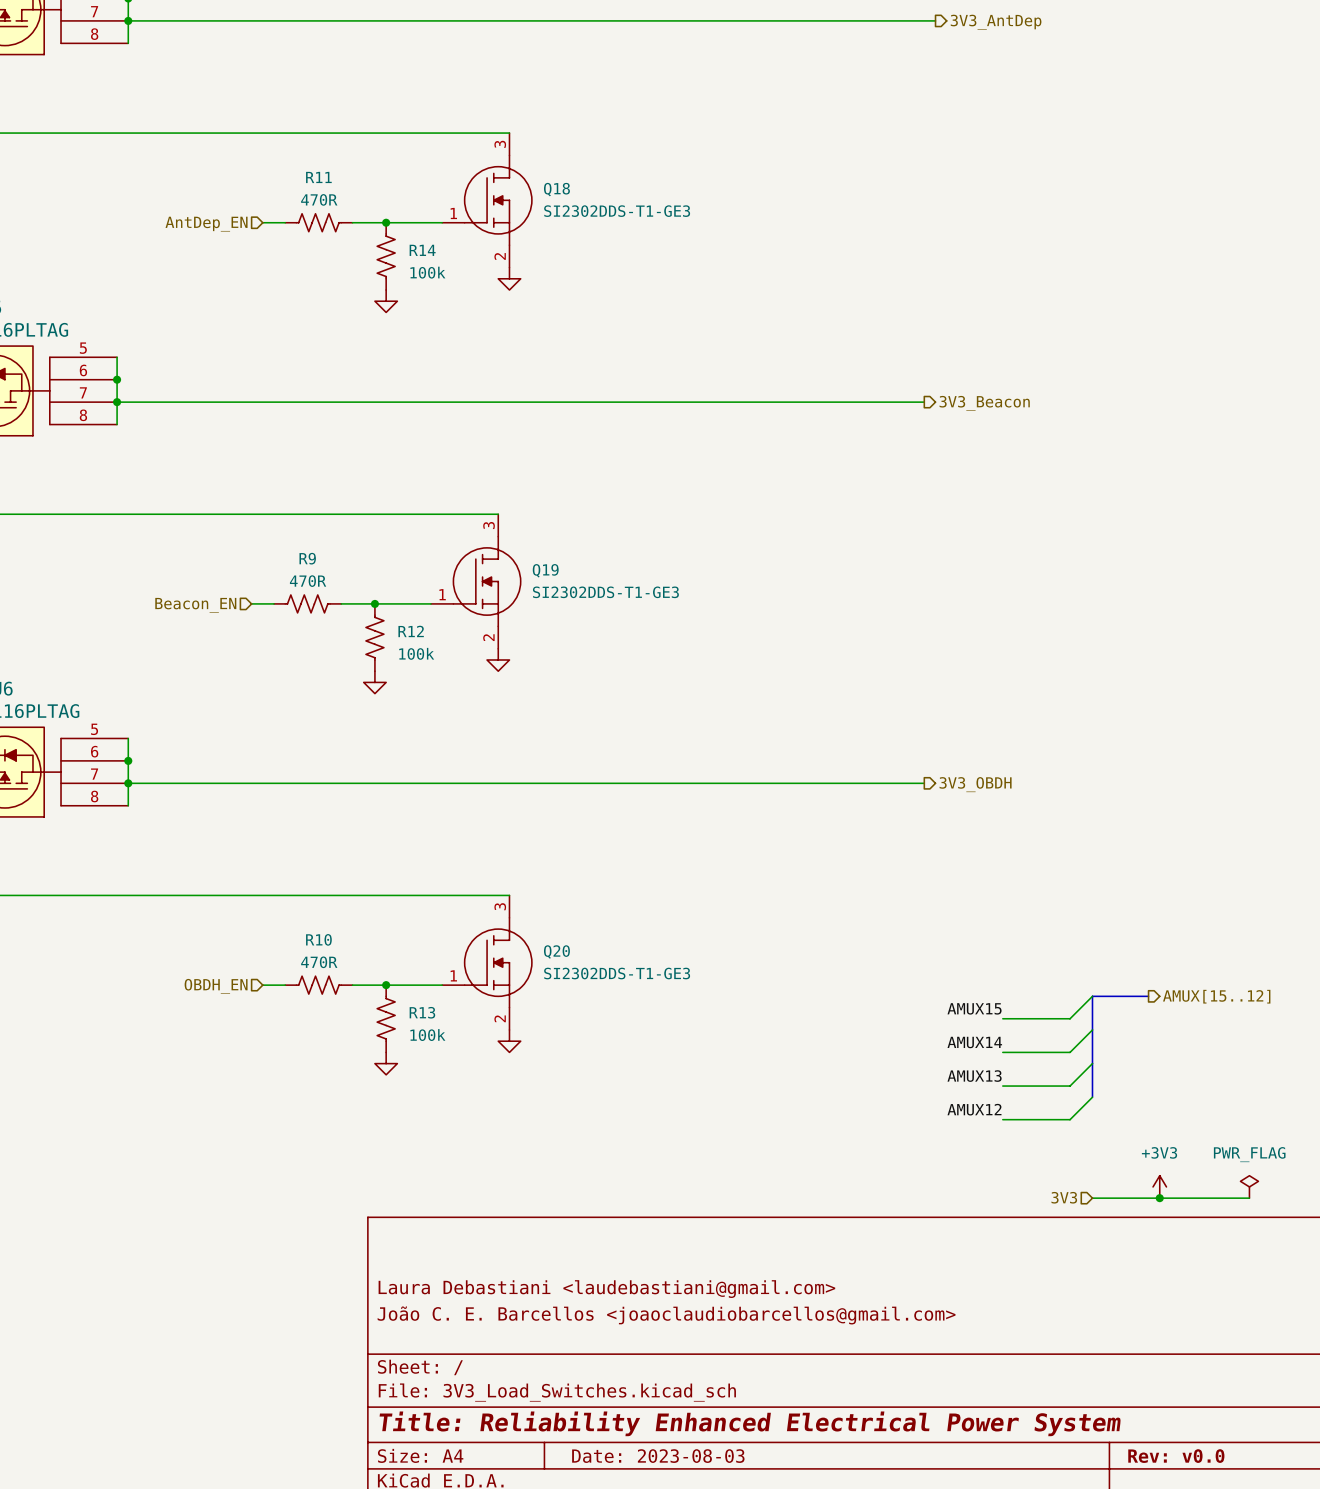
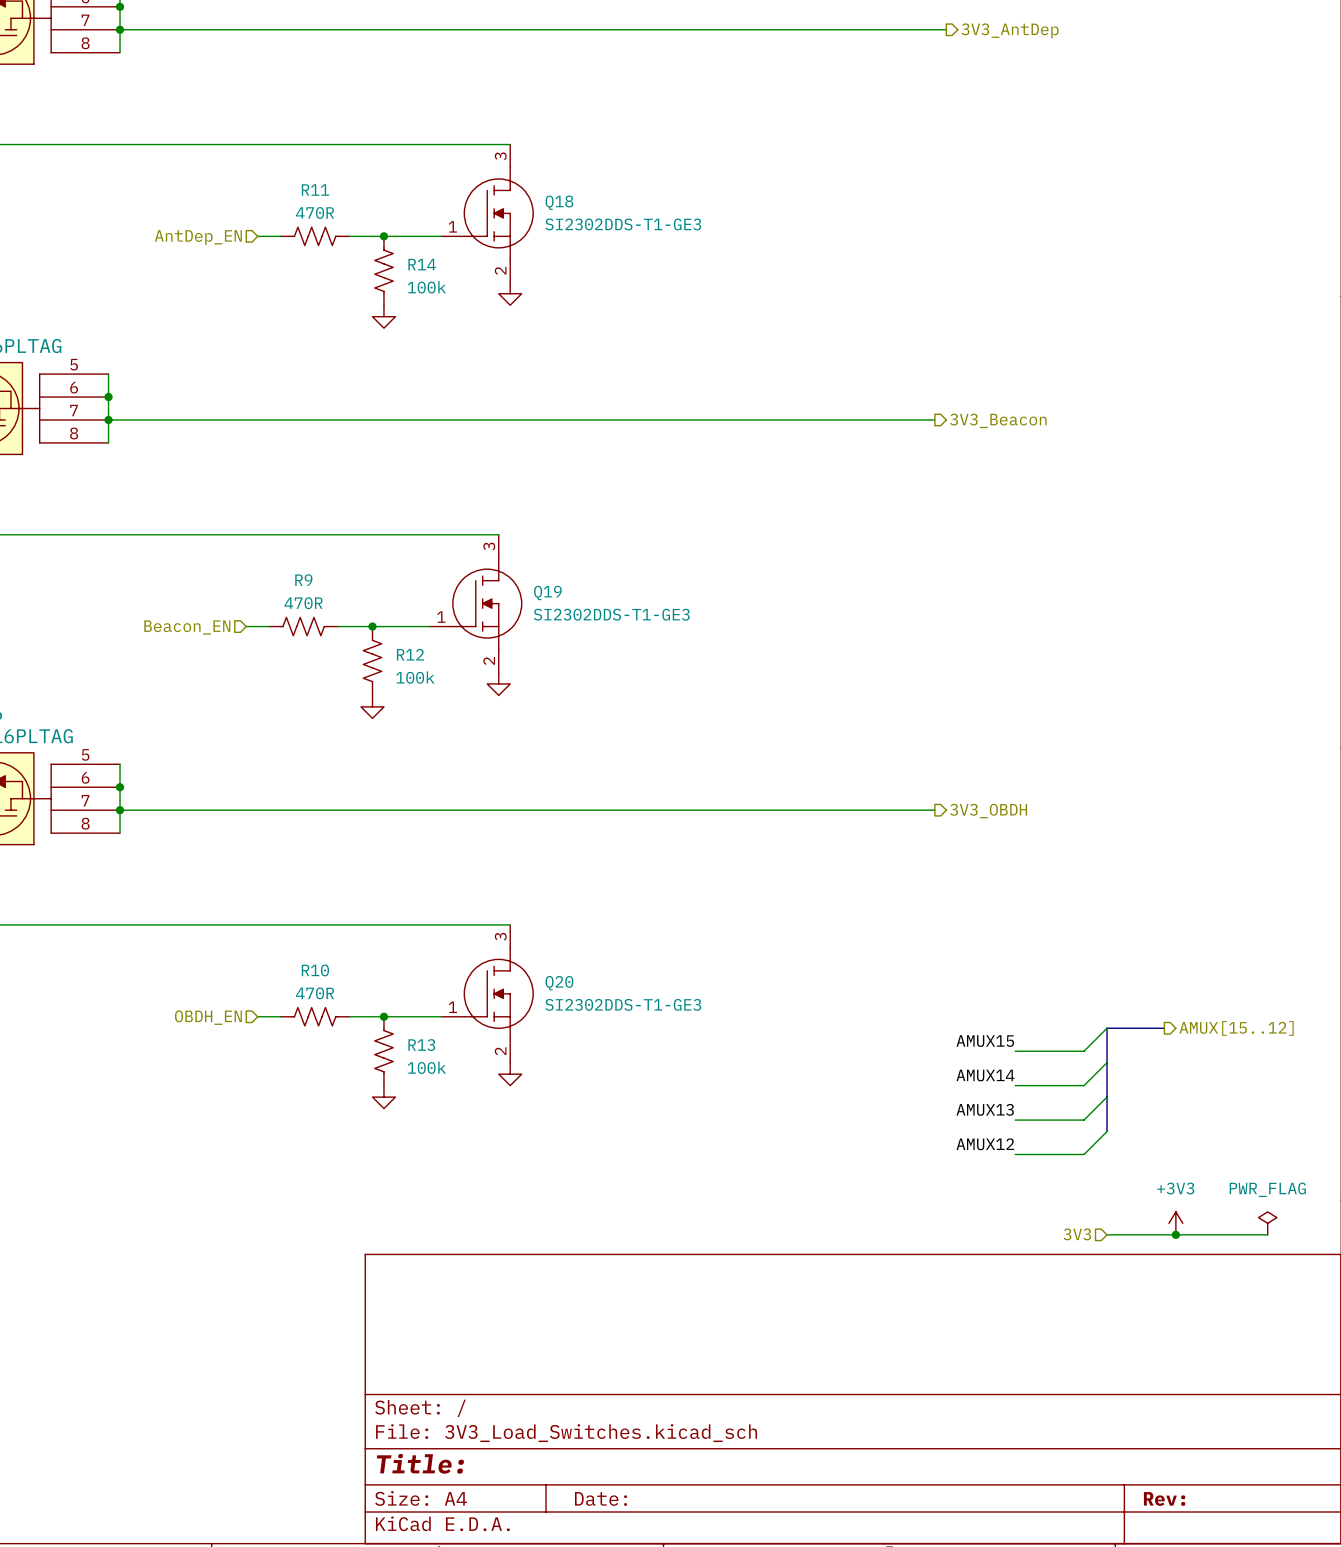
title block: Laura Debastiani <laudebastiani@gmail.com> (606, 1289) -> none
title block: João C. E. Barcellos <joaoclaudiobarcellos@gmail.com> (666, 1315) -> none
title block: Title: Reliability Enhanced Electrical Power System (750, 1423) -> Title: (420, 1463)
title block: Date: 2023-08-03 (658, 1456) -> Date: (600, 1498)
title block: Rev: v0.0 (1176, 1456) -> Rev: (1164, 1498)

